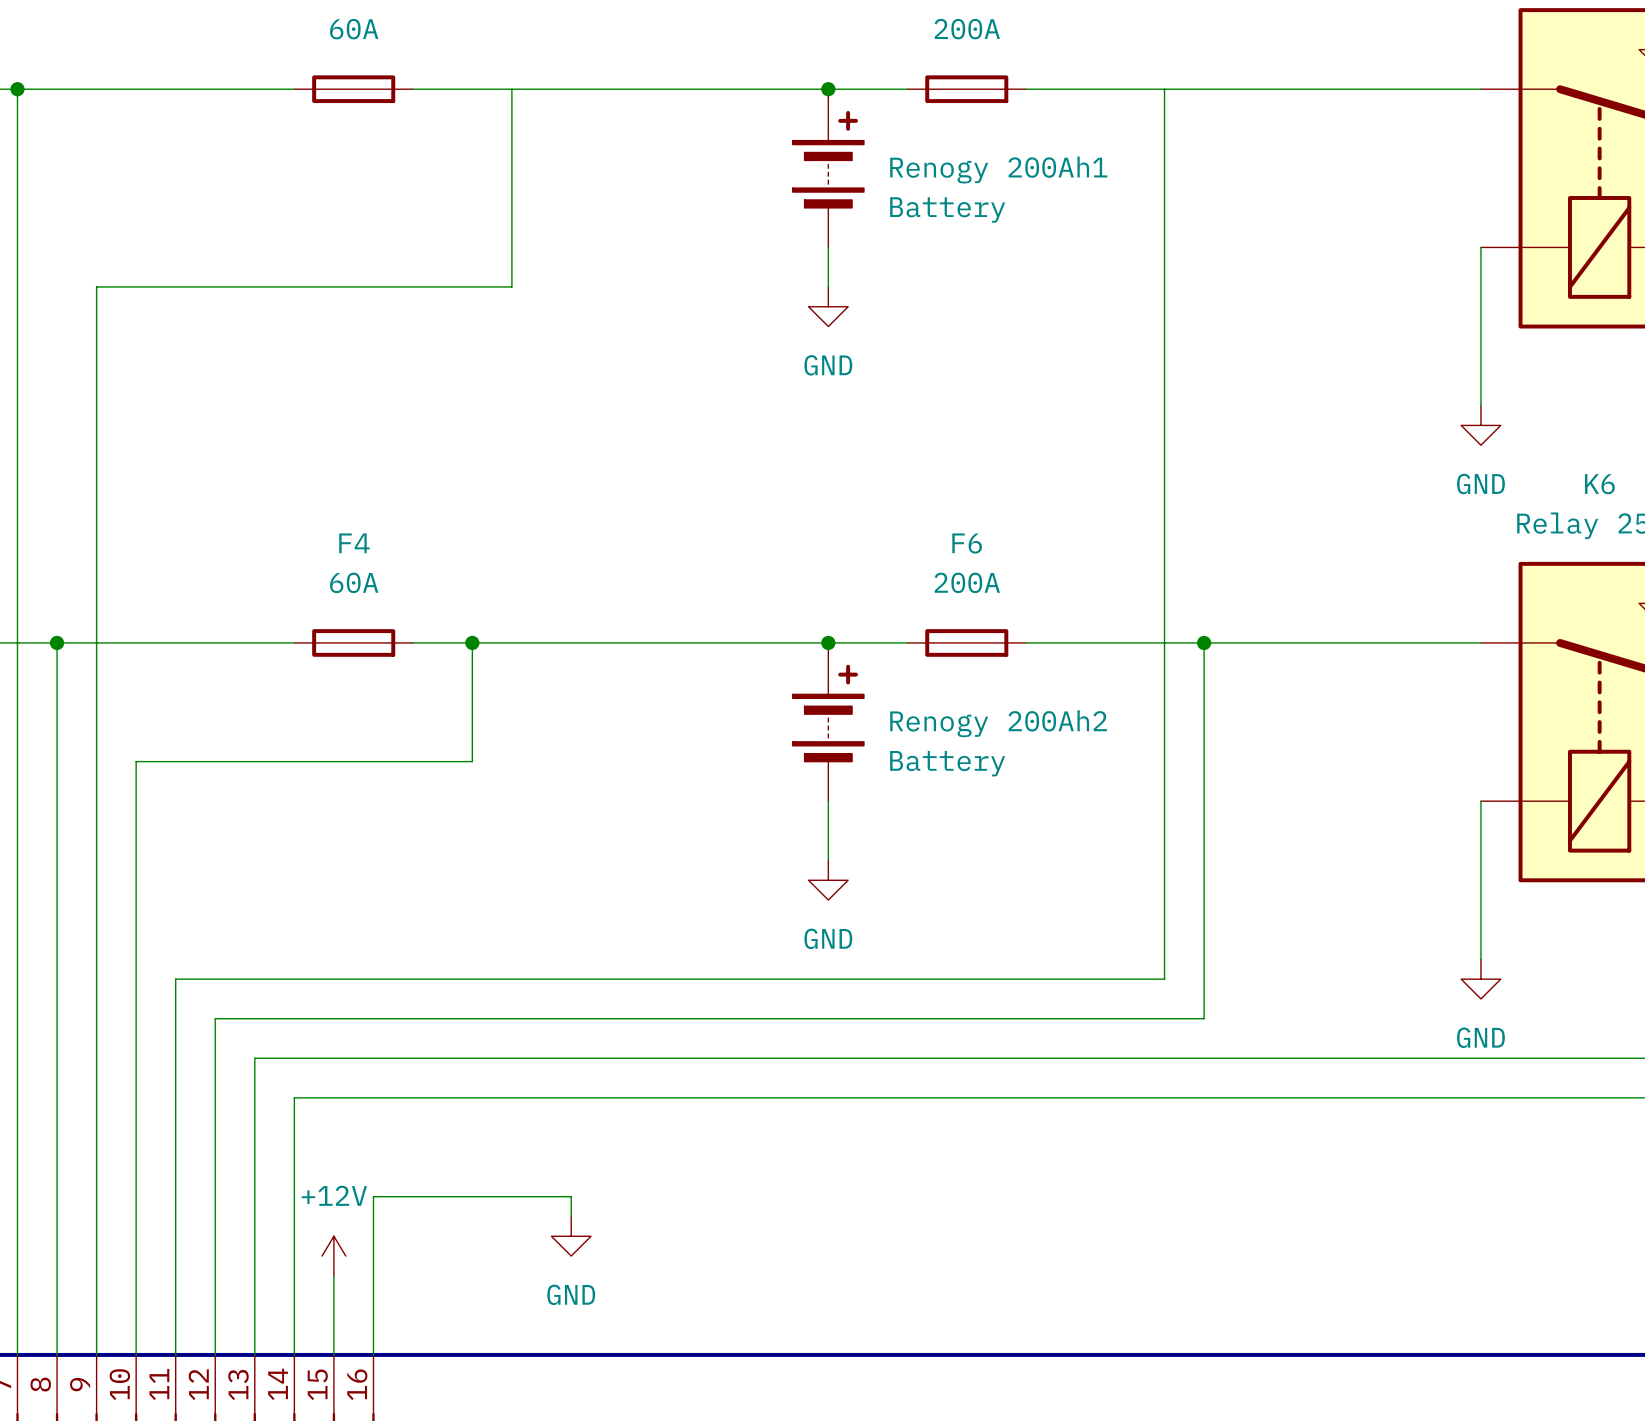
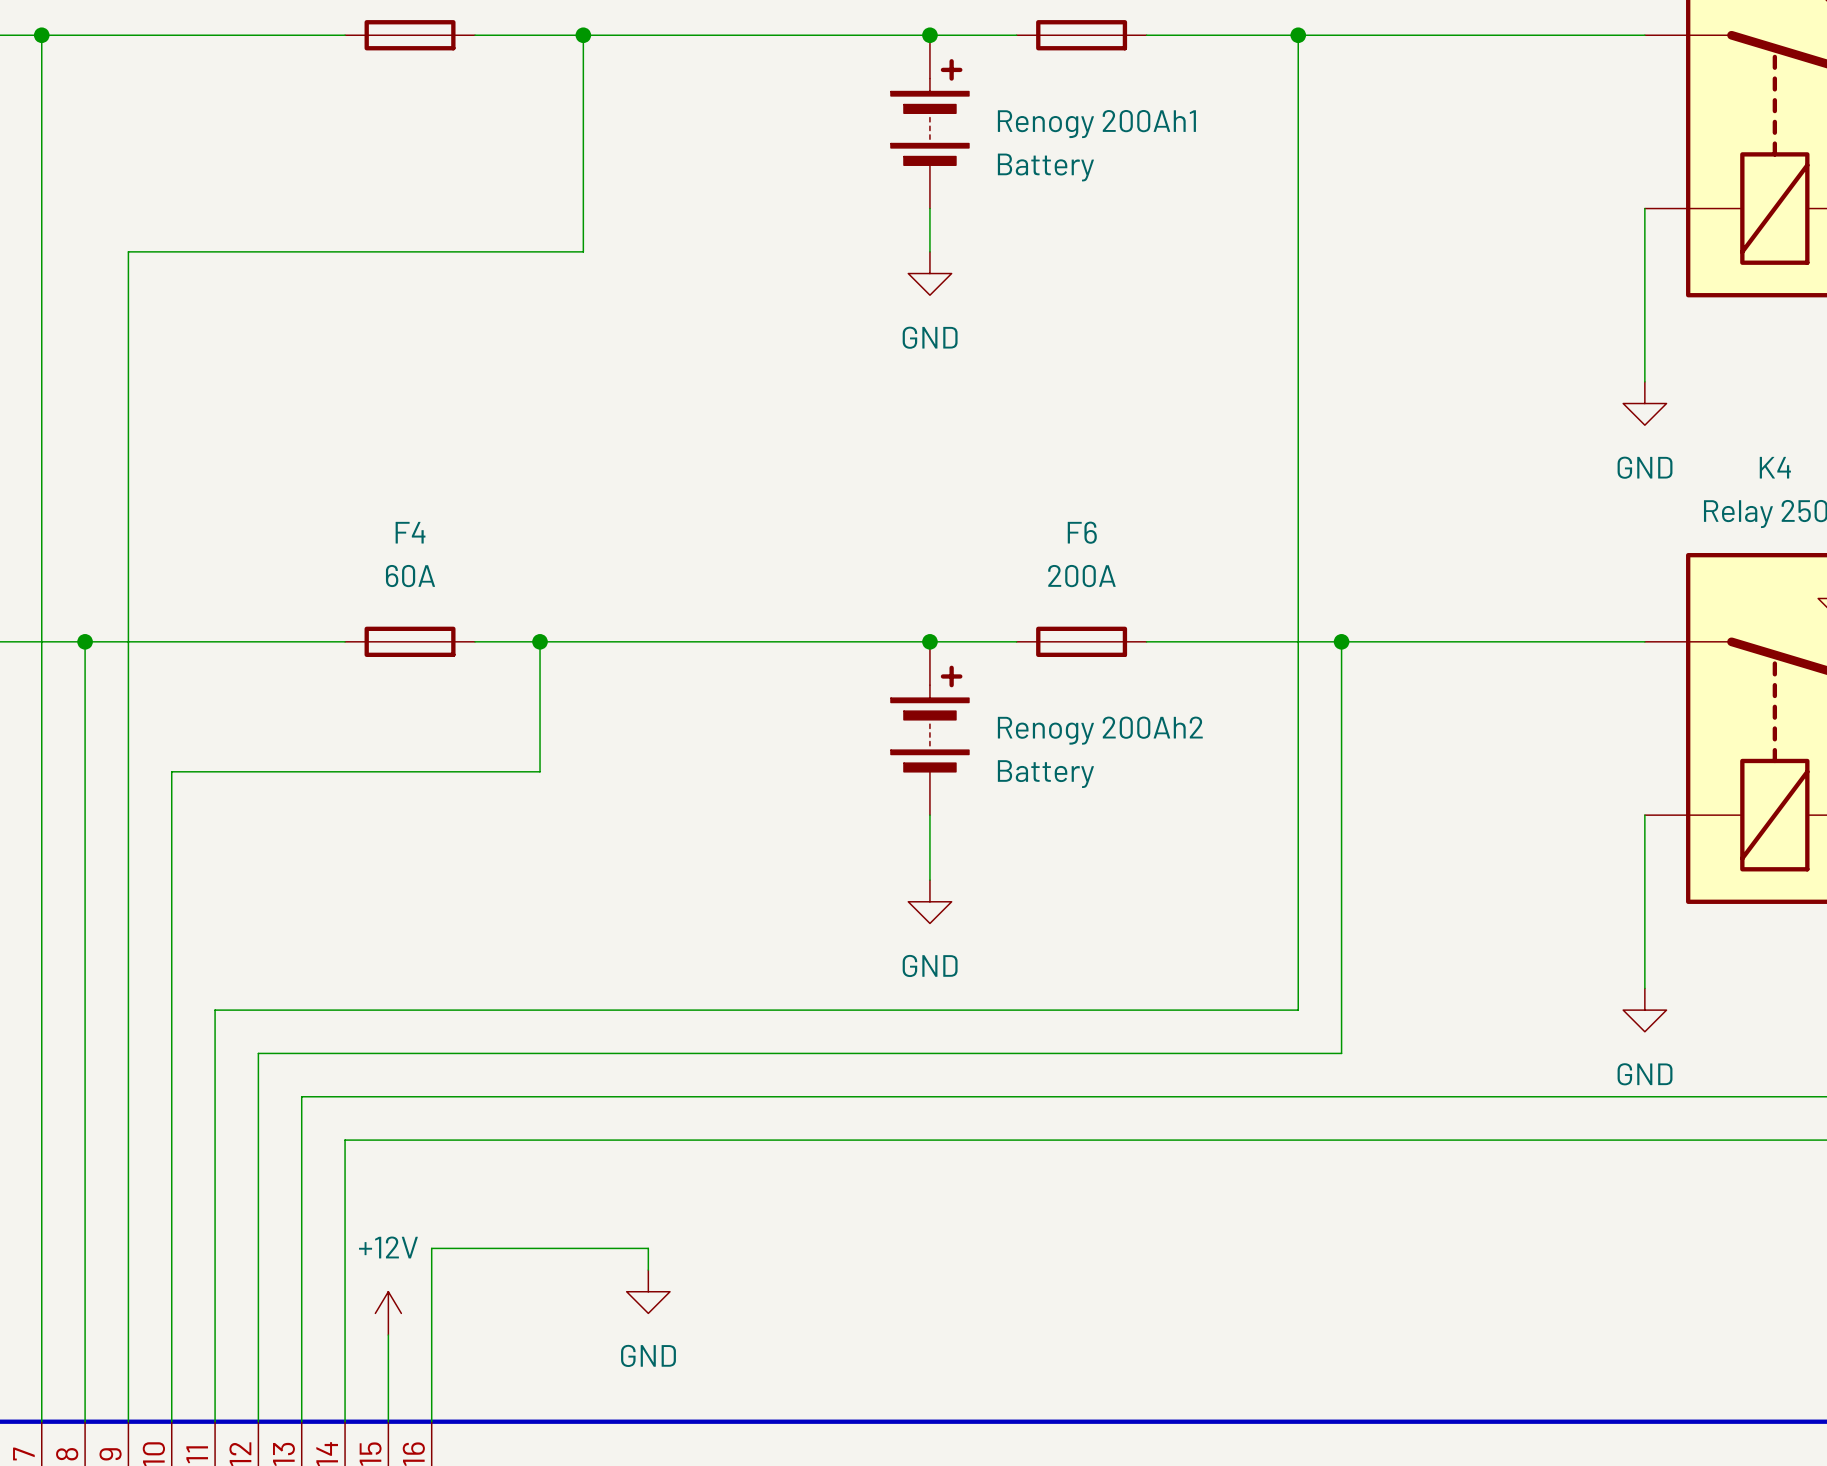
junction: none -> (583, 35)
junction: none -> (1298, 35)
K6 name: K6 (1599, 484) -> K4 (1775, 467)

